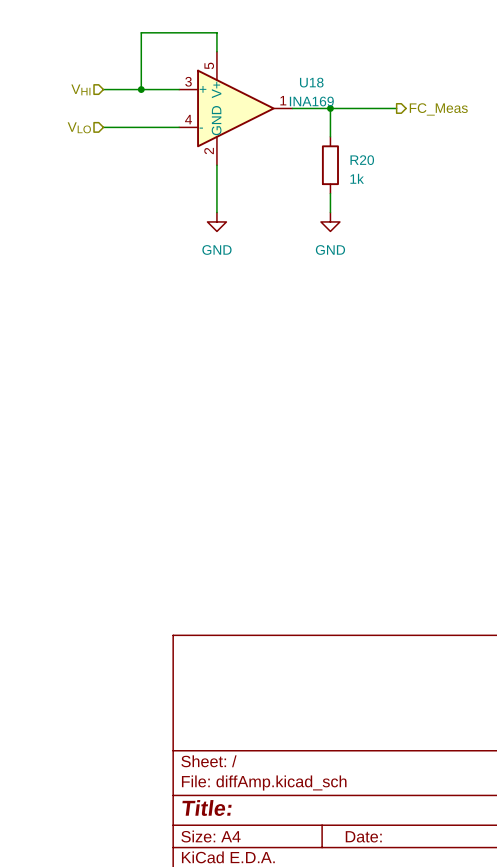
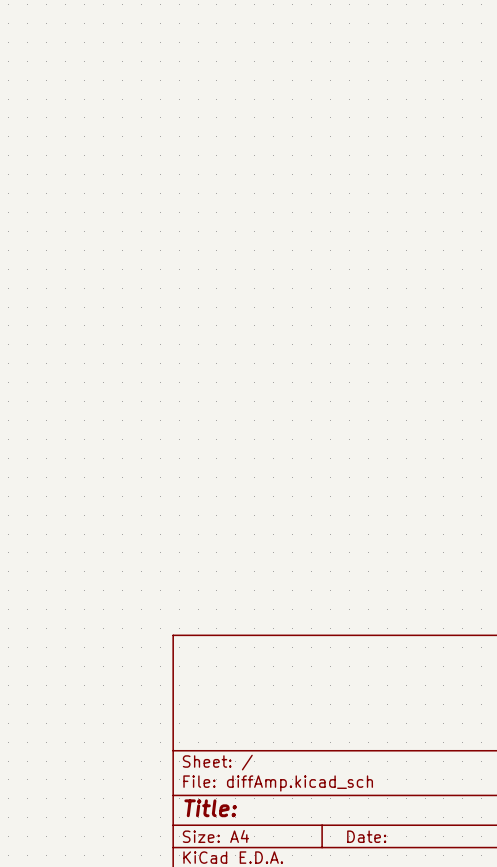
wire: (216, 51) (216, 32) (141, 32) (141, 89) -> none
hierarchical label: VHI (80, 89) -> none
wire: (103, 89) (179, 89) -> none
junction: (141, 89) -> none
U18: INA169 (235, 108) -> none
wire: (292, 108) (396, 108) -> none
wire: (330, 108) (330, 136) -> none
junction: (330, 108) -> none
hierarchical label: FC_Meas (438, 109) -> none
hierarchical label: VLO (79, 127) -> none
wire: (103, 127) (179, 127) -> none
wire: (216, 165) (216, 212) -> none
R20: 1k (330, 165) -> none
wire: (330, 193) (330, 212) -> none
power symbol: GND (216, 221) -> none
power symbol: GND (330, 221) -> none

